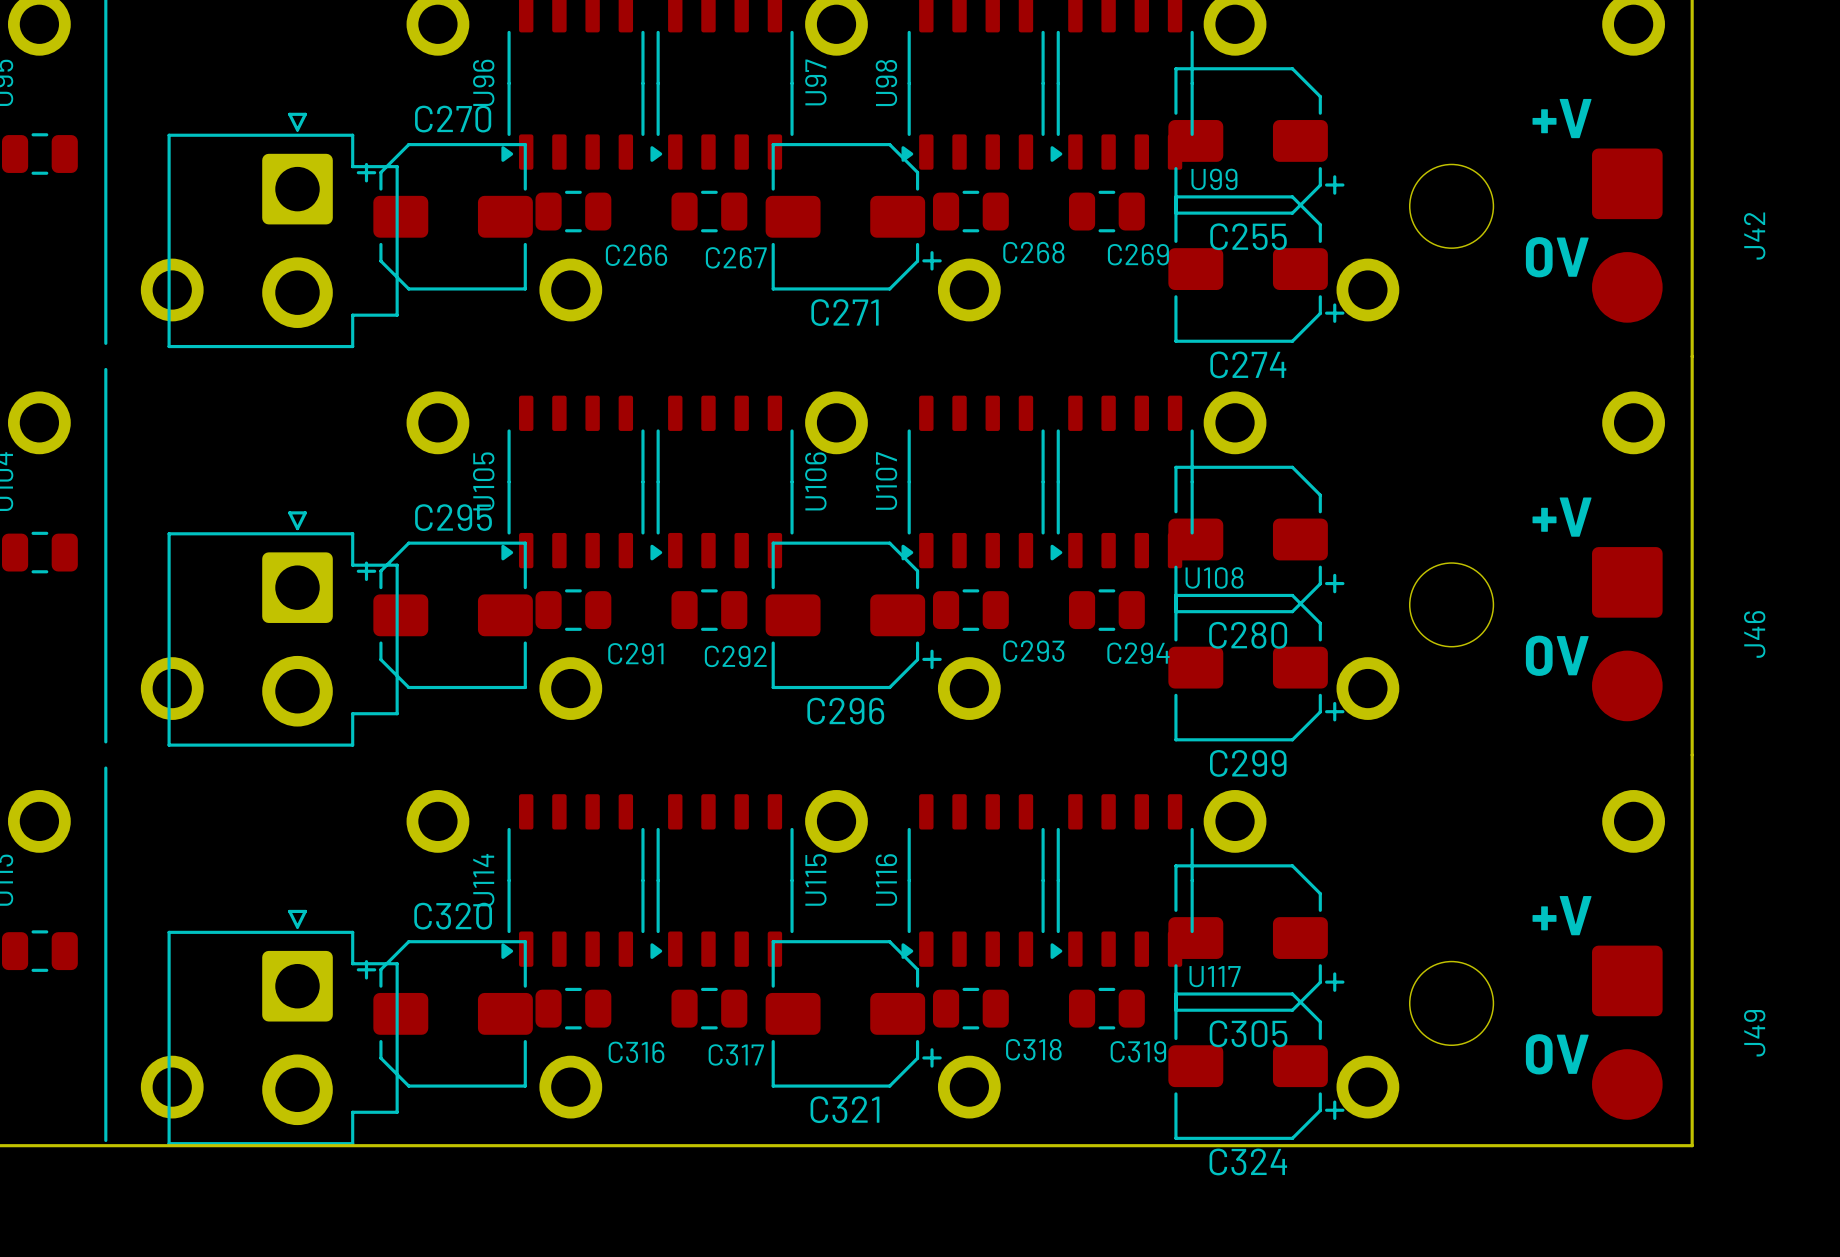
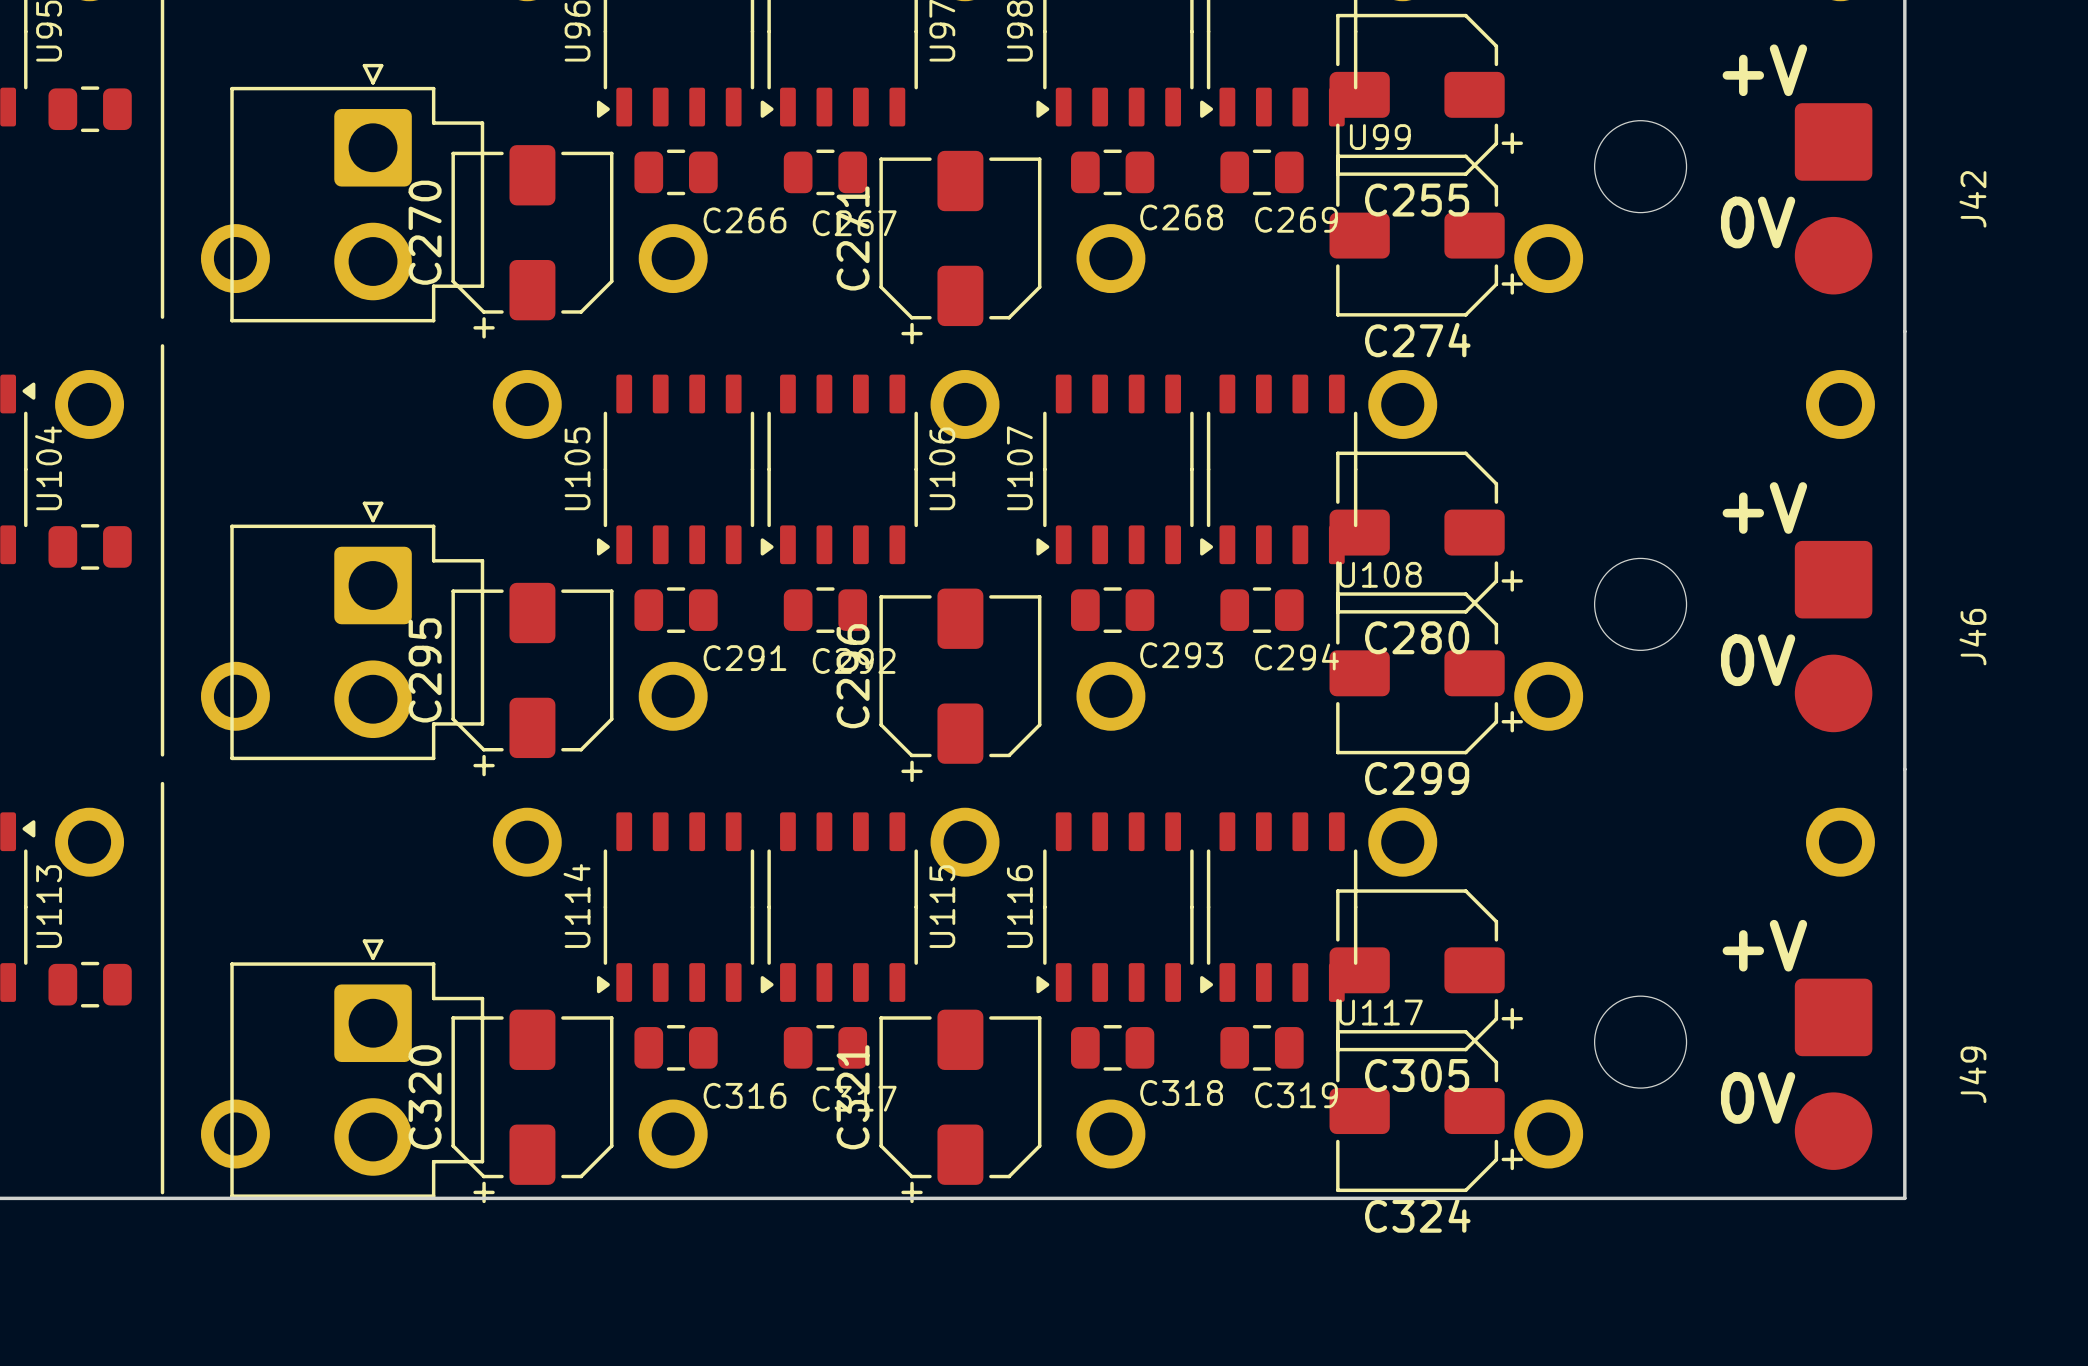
C270 rotation: 0° (444, 216) -> 90° counterclockwise (532, 241)
C271 rotation: 0° (853, 216) -> 90° clockwise (960, 247)
C295 rotation: 0° (444, 615) -> 90° counterclockwise (532, 679)
C296 rotation: 0° (853, 615) -> 90° clockwise (960, 685)
C320 rotation: 0° (444, 1013) -> 90° counterclockwise (532, 1106)
C321 rotation: 0° (853, 1013) -> 90° clockwise (960, 1106)

